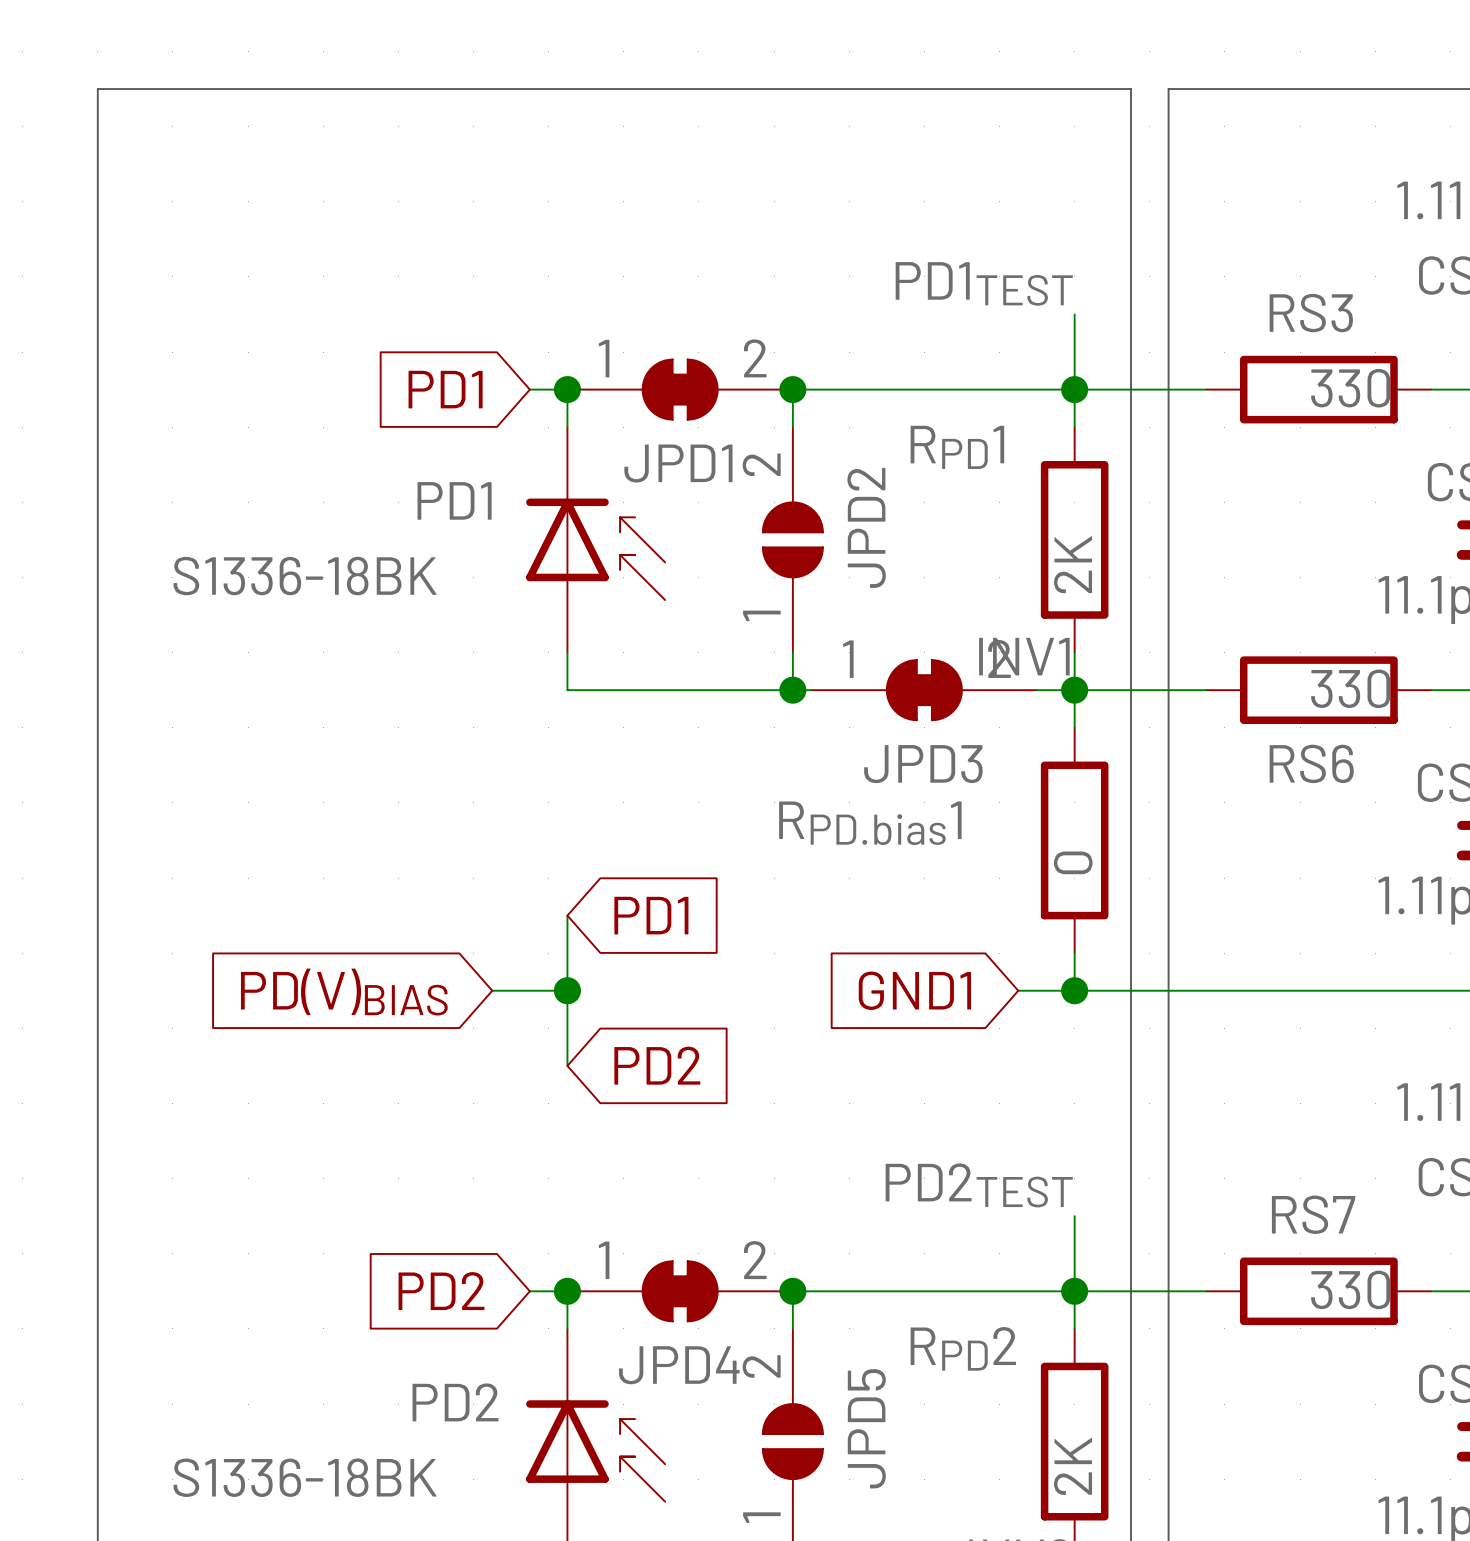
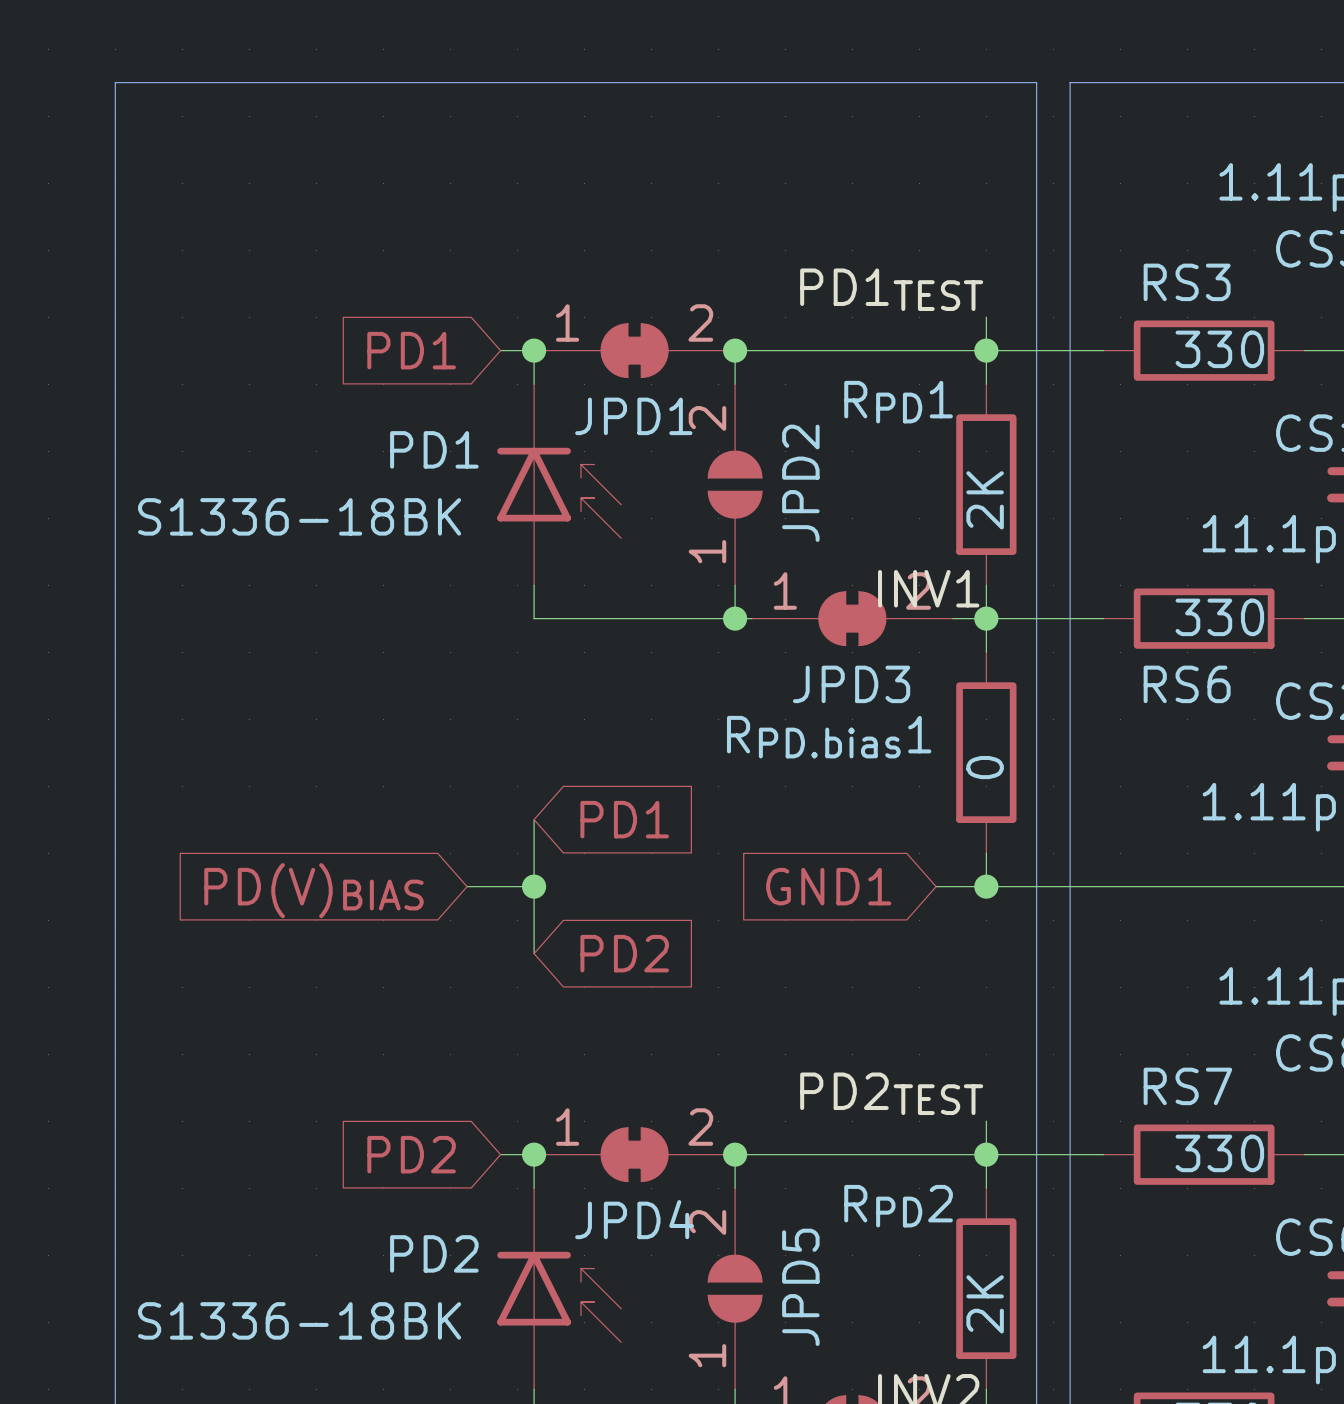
label position: PD1TEST (984, 283) -> PD1TEST (891, 289)
wire: (1074, 314) (1074, 352) -> none
label position: PD2TEST (979, 1185) -> PD2TEST (891, 1093)
wire: (1074, 1216) (1074, 1253) -> none

